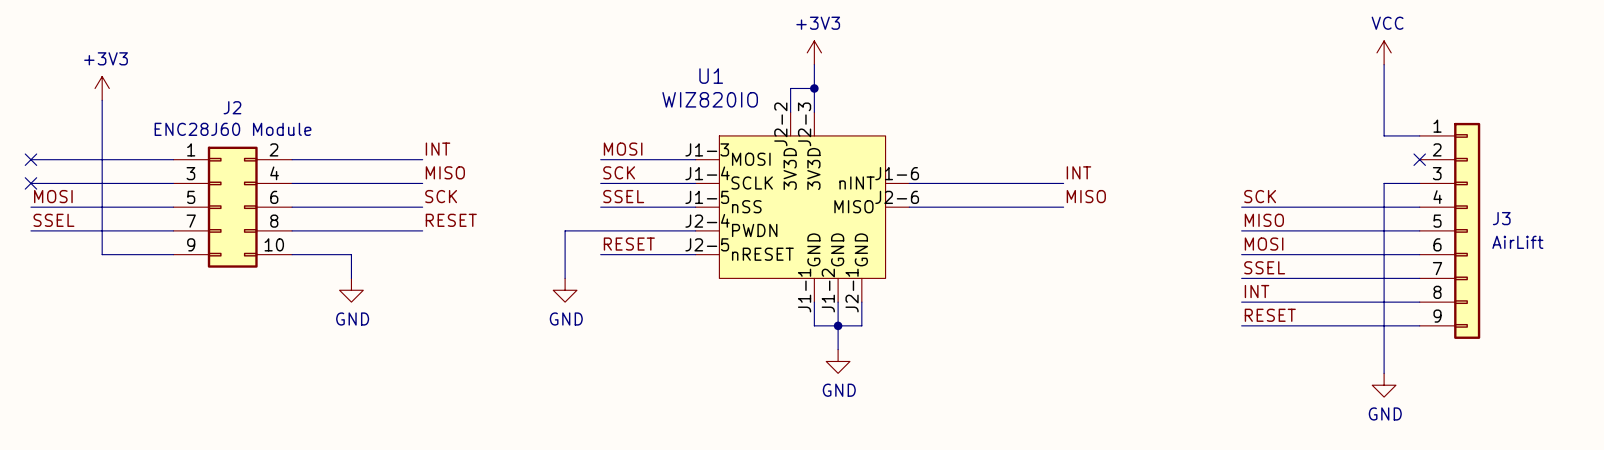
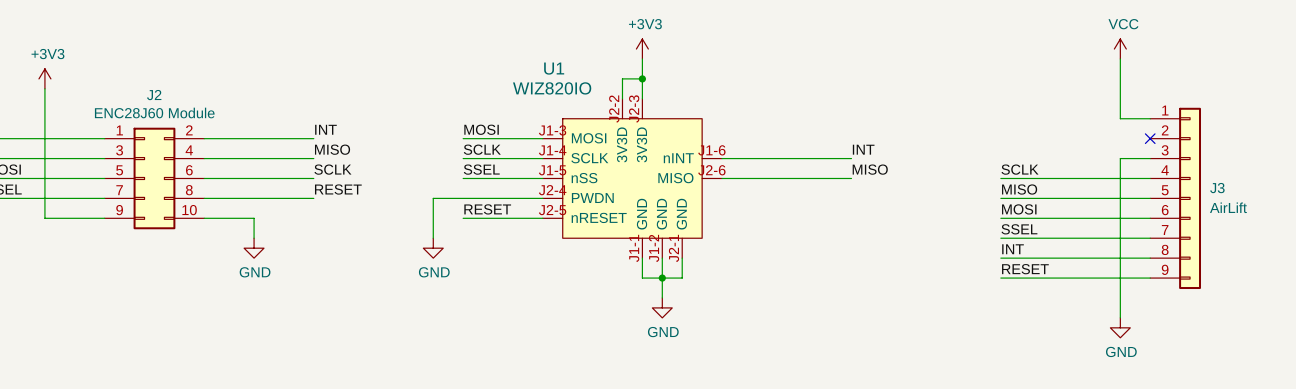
label: SCK (619, 172) -> SCLK (482, 149)
label: SCK (441, 196) -> SCLK (332, 169)
label: SCK (1260, 196) -> SCLK (1020, 169)

